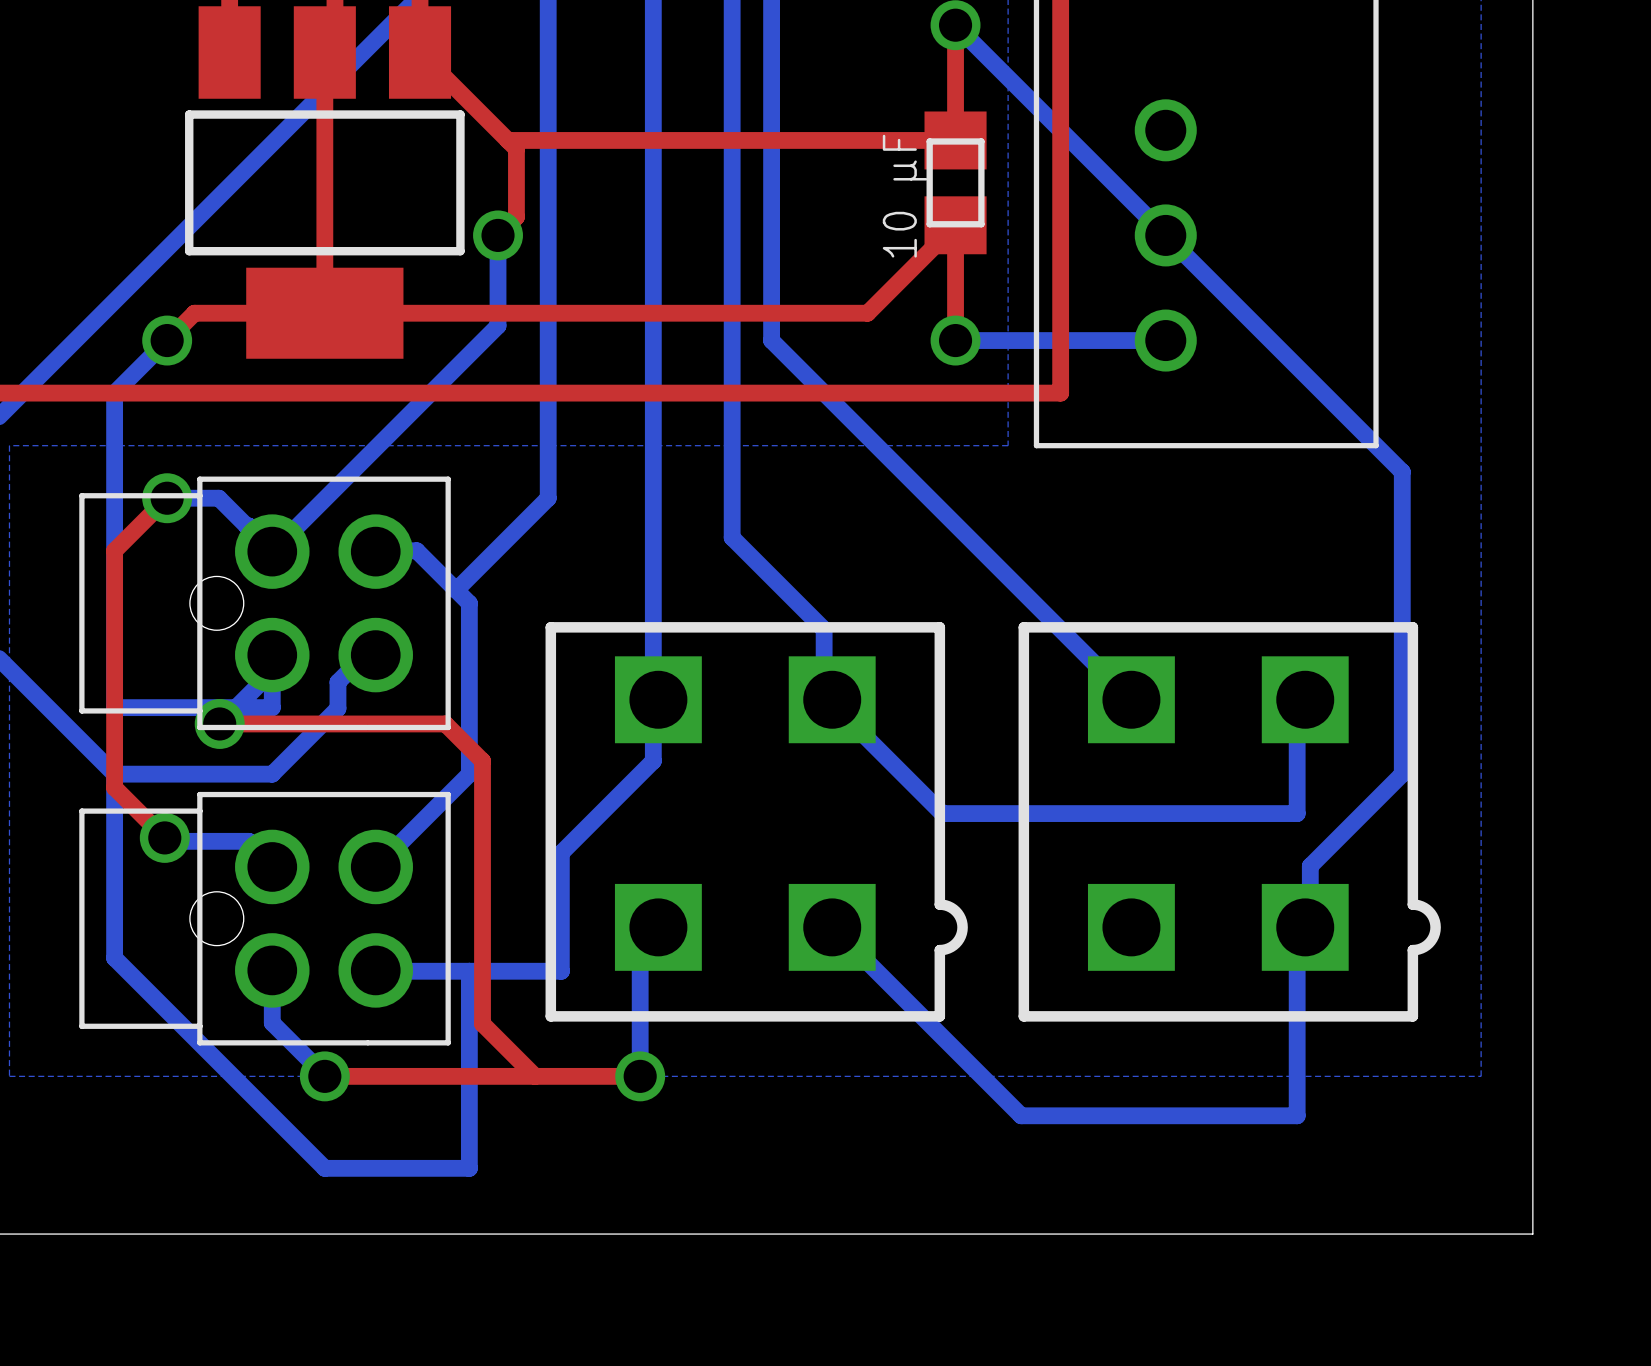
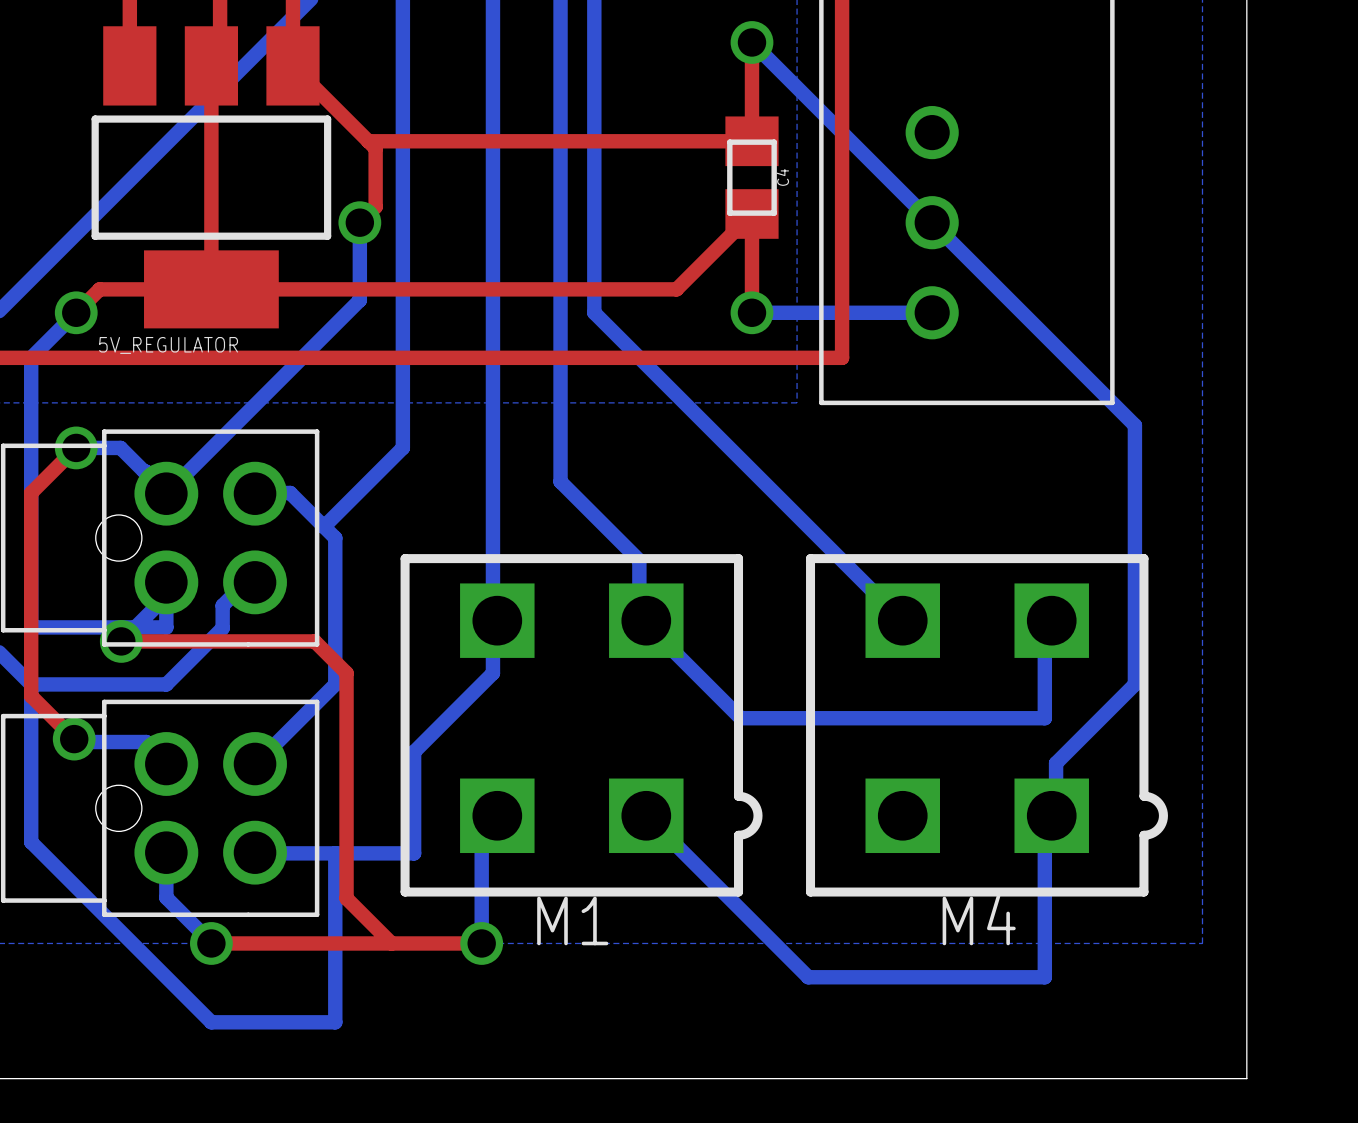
C4 name: none -> C4 (782, 177)
C4 value: 10 μF (905, 196) -> none
5V_REGULATOR name: none -> 5V_REGULATOR (168, 345)
M4 name: none -> M4 (979, 919)
M1 name: none -> M1 (572, 920)

